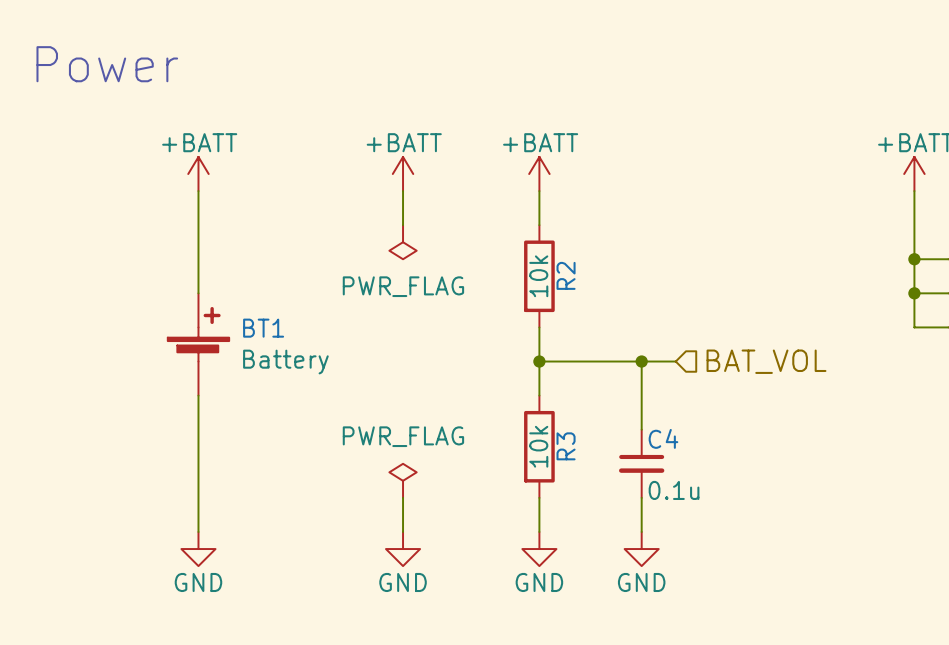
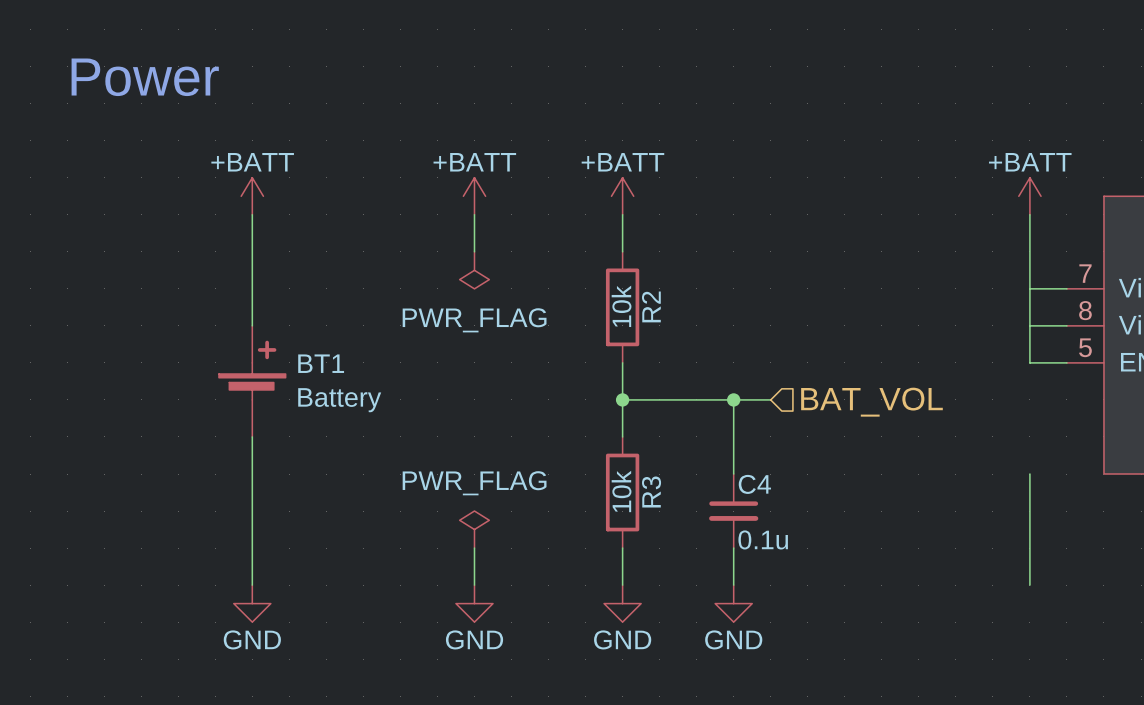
junction: (914, 259) -> none
junction: (914, 293) -> none
wire: none -> (1029, 474) (1029, 585)

